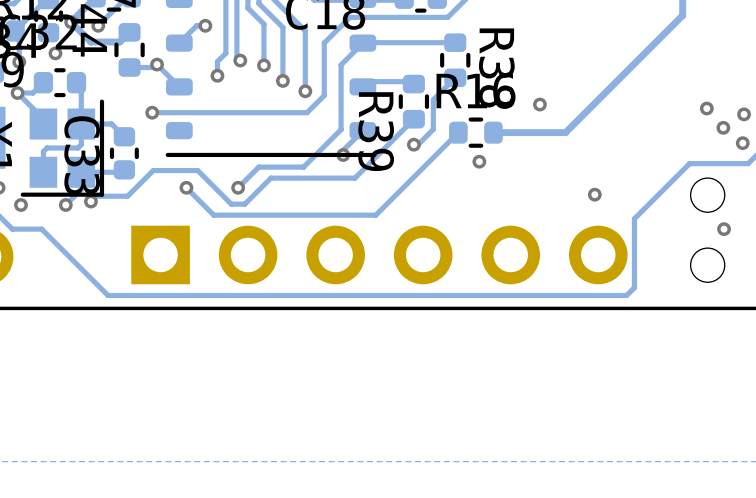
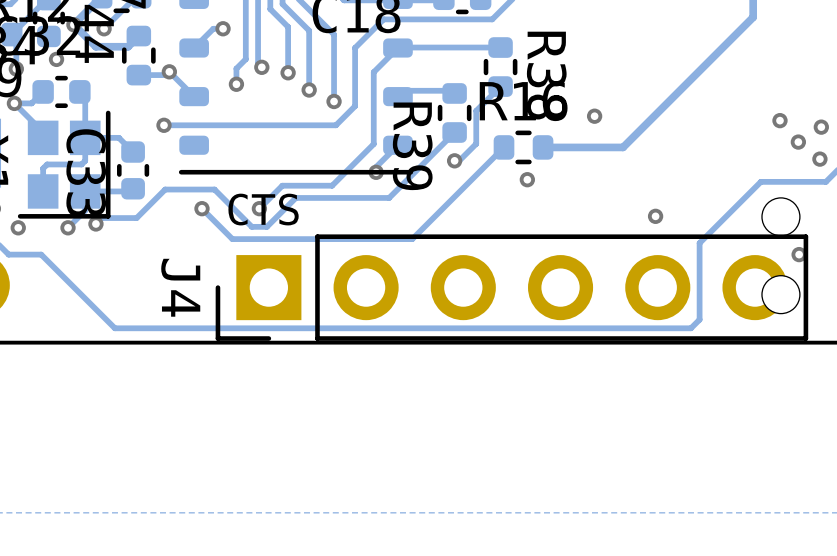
text: none -> CTS (263, 209)
part: (379, 254) -> none
J4: none -> (511, 287)

